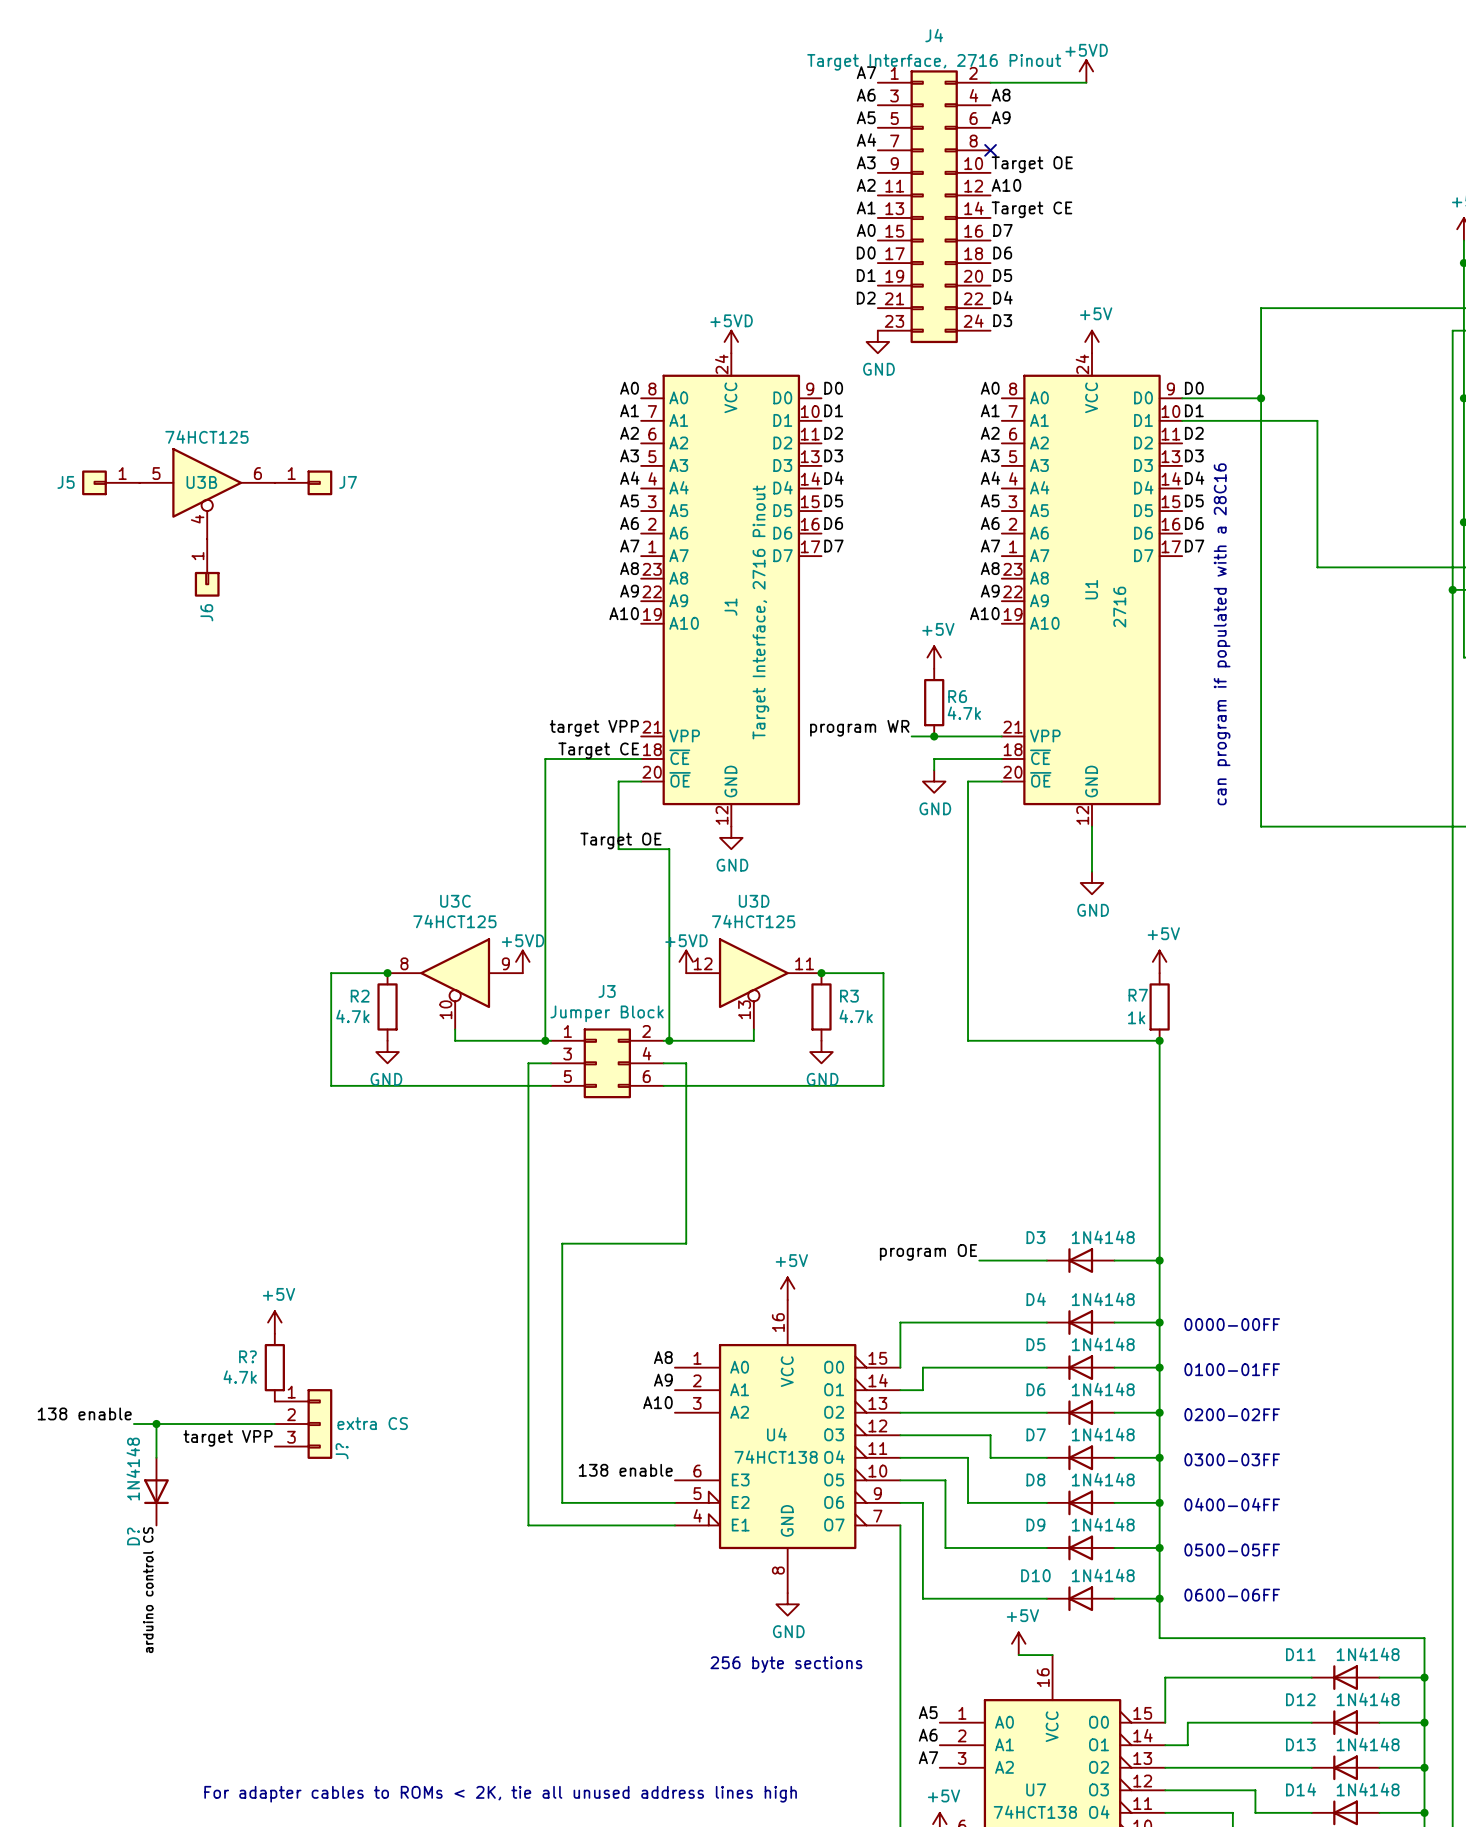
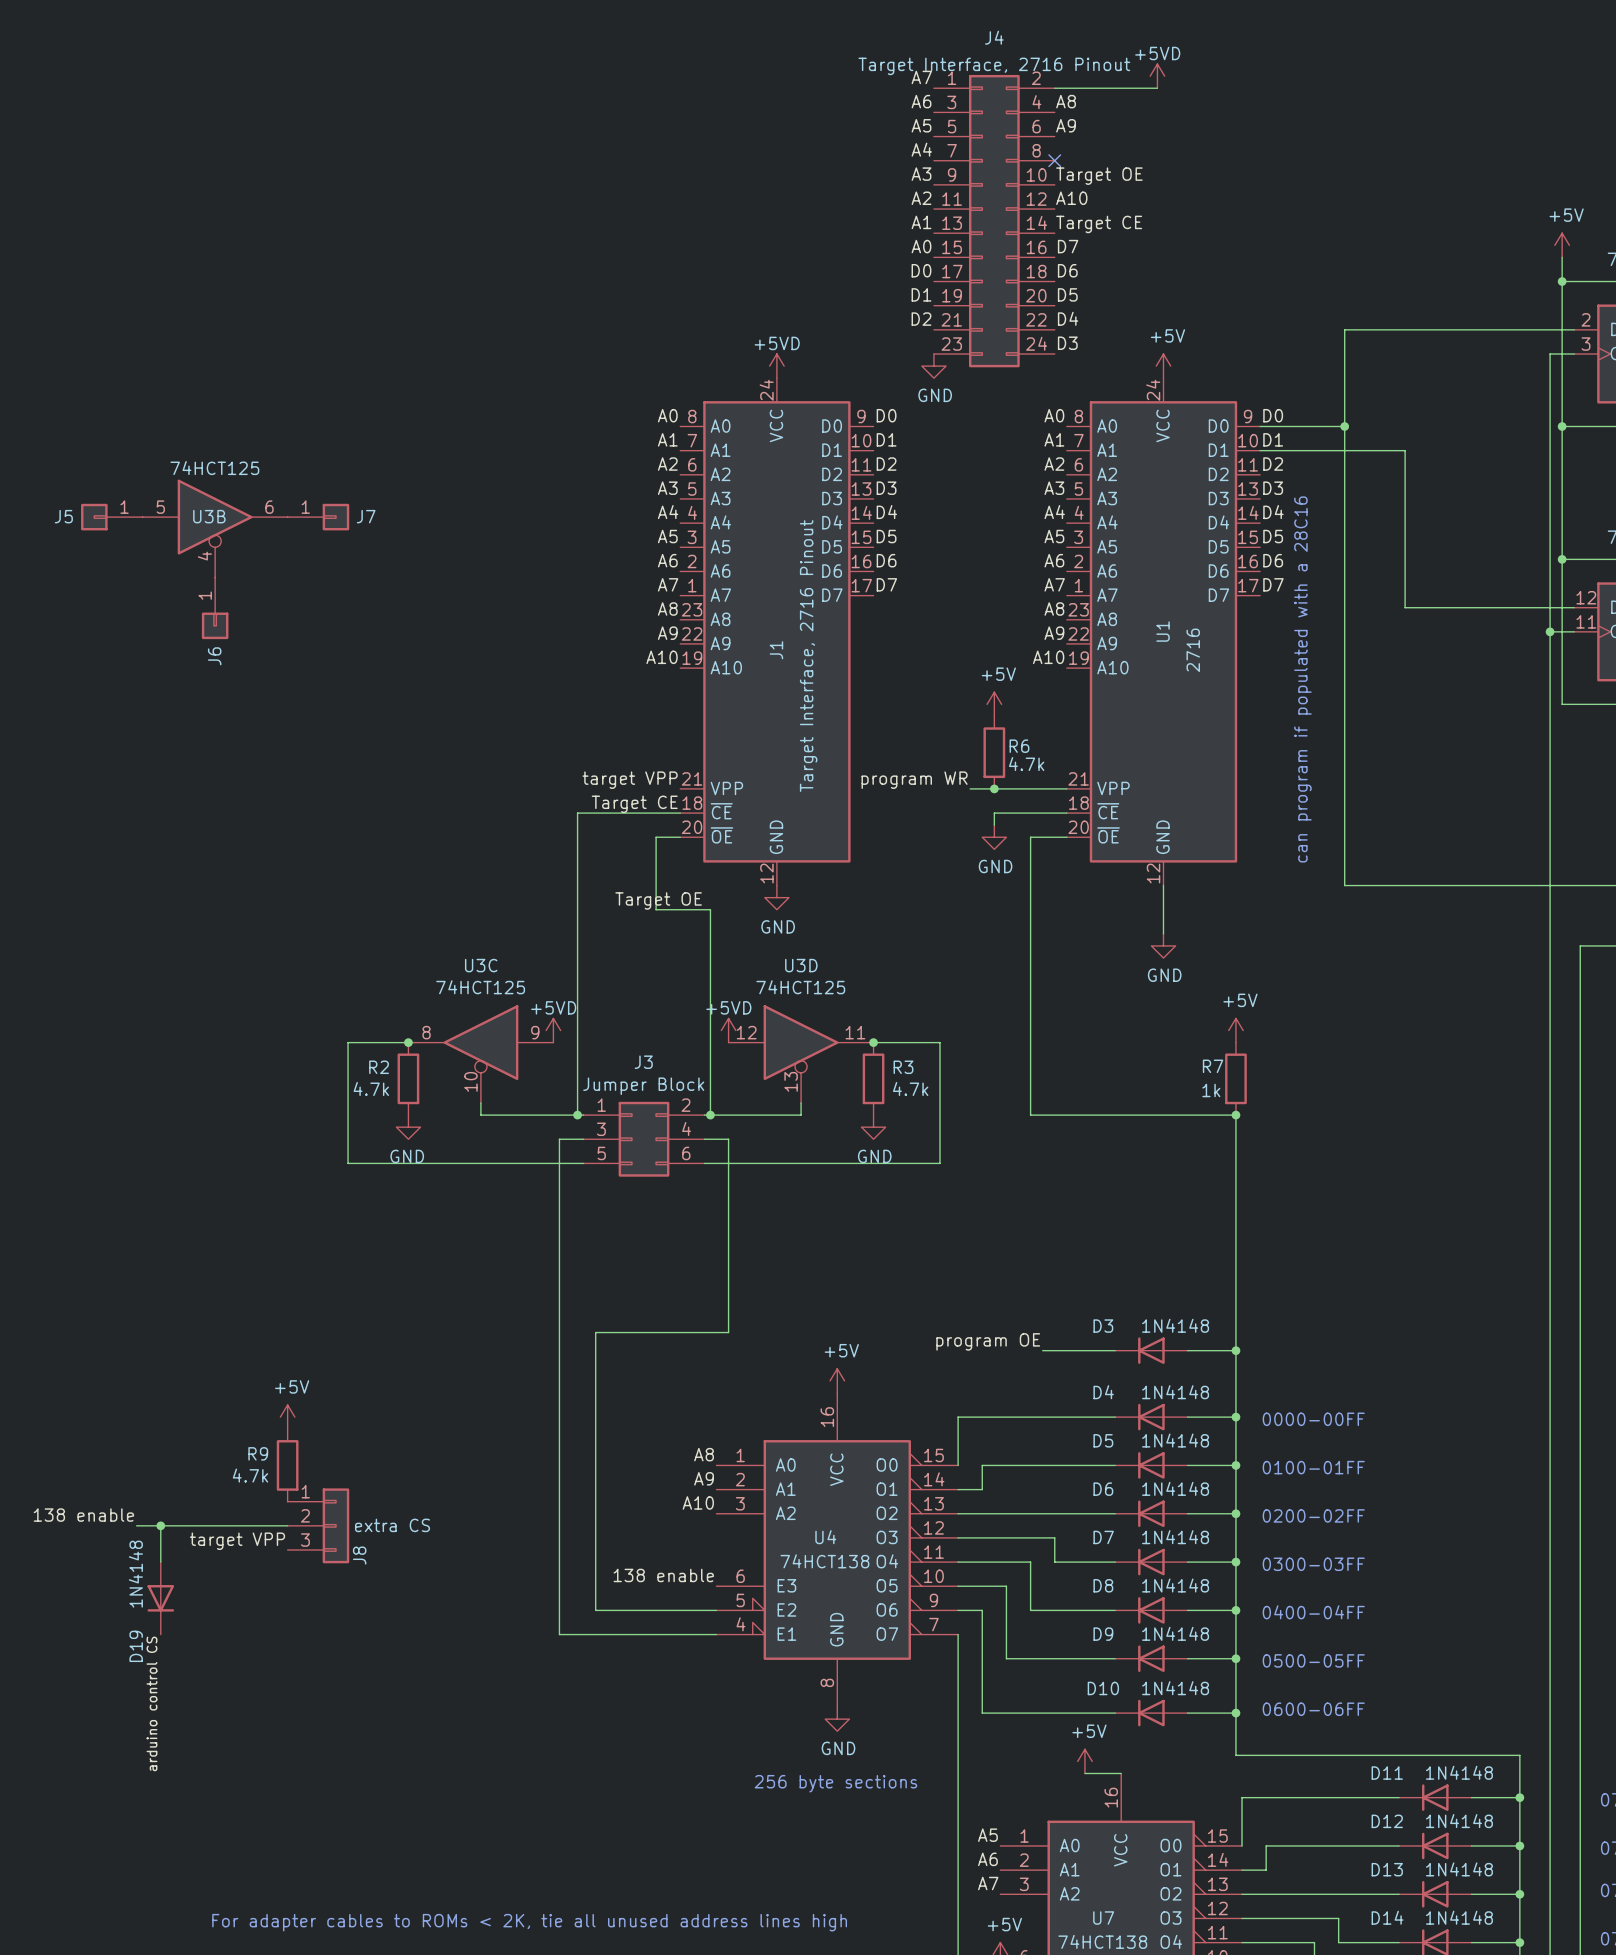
R? name: R? (247, 1356) -> R9 (258, 1453)
J? name: J? (342, 1451) -> J8 (359, 1555)
D? name: D? (133, 1536) -> D19 (136, 1646)

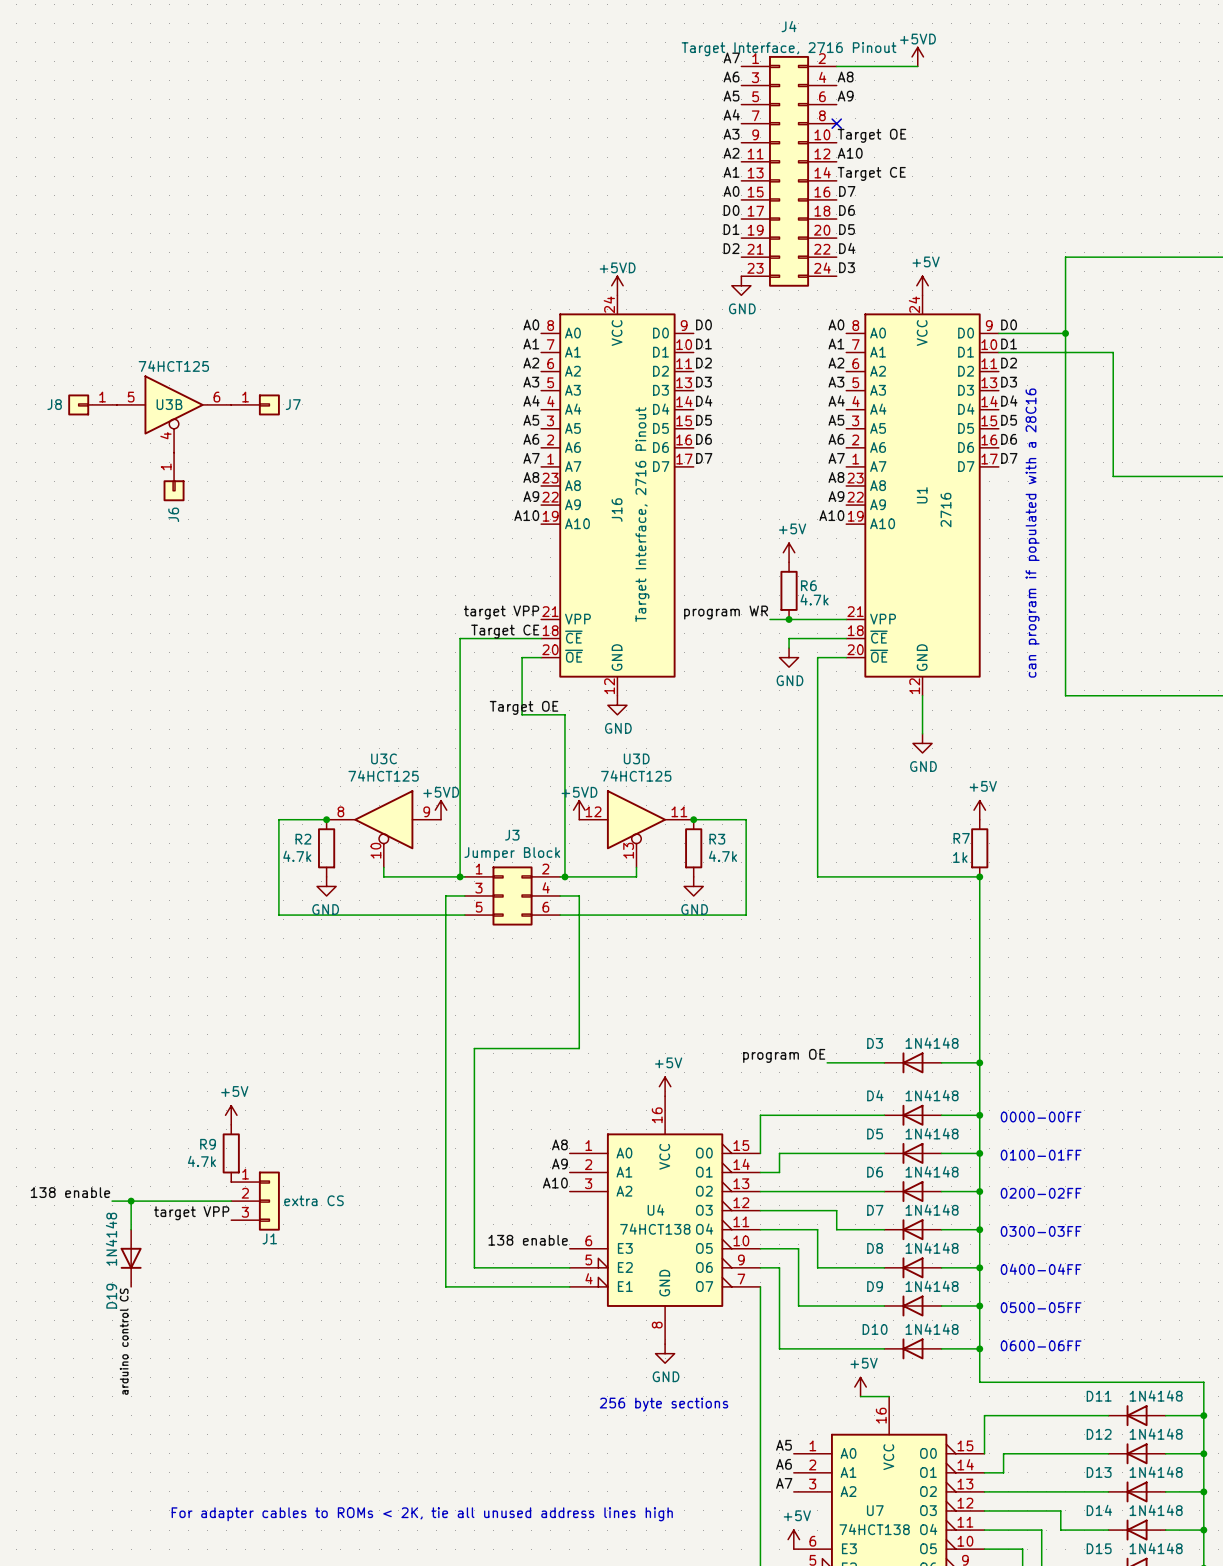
J5 name: J5 (63, 516) -> J8 (54, 404)
J1 name: J1 (776, 650) -> J16 (617, 510)
J8 name: J8 (359, 1555) -> J1 (269, 1238)

